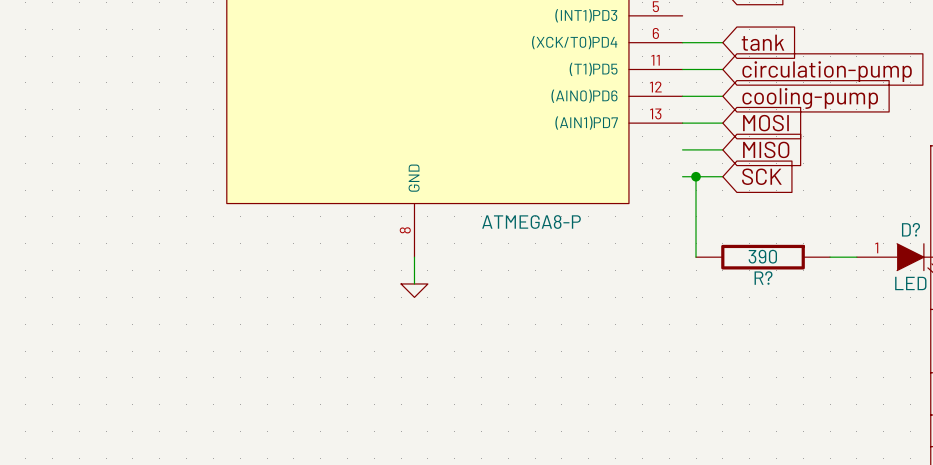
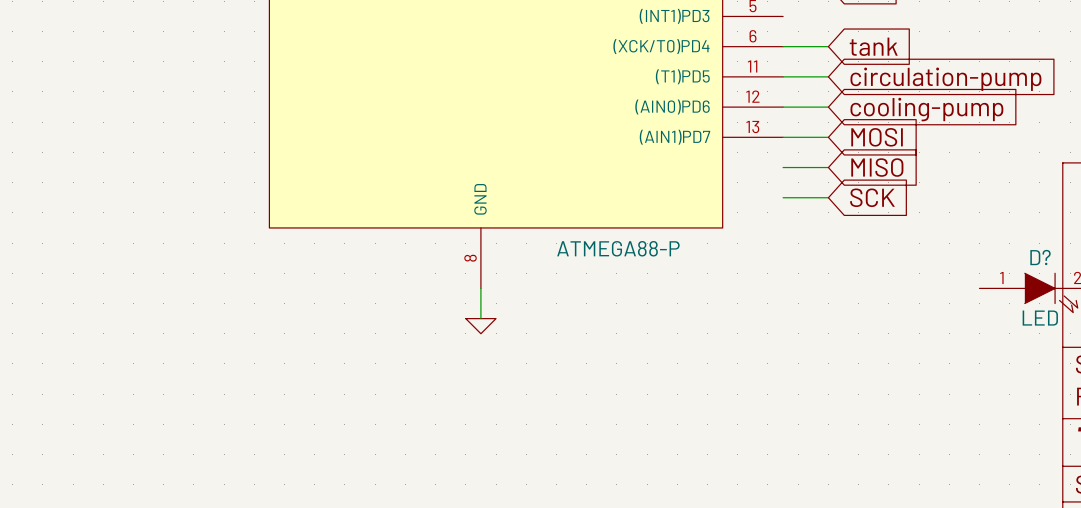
wire: (696, 176) (696, 257) -> none
junction: (696, 176) -> none
part value: ATMEGA8-P (531, 221) -> ATMEGA88-P (618, 248)
R?: 390 (763, 257) -> none
wire: (830, 257) (856, 257) -> none

